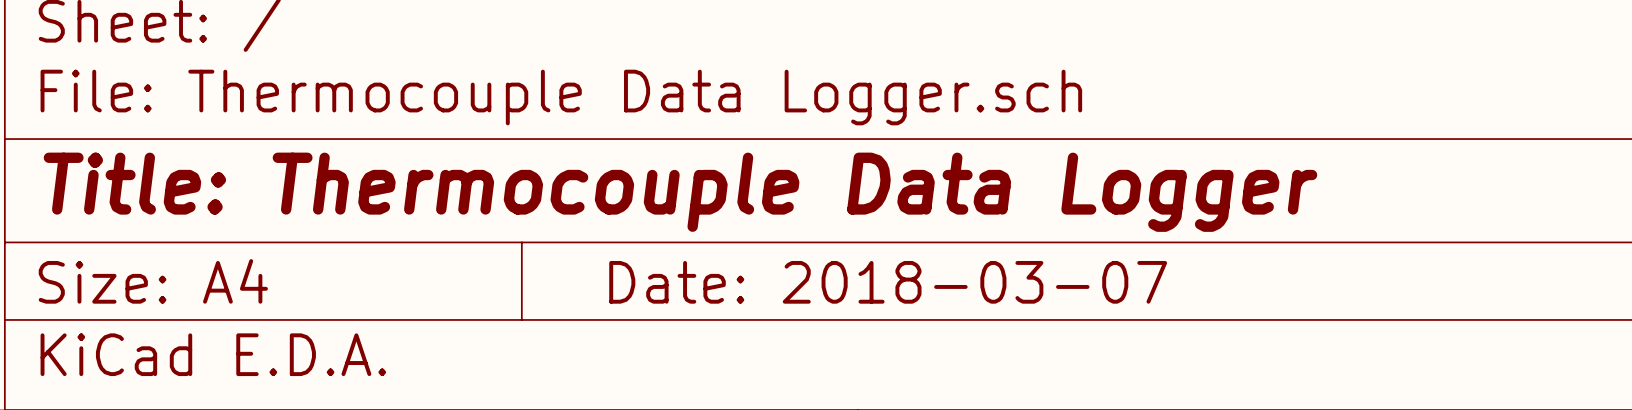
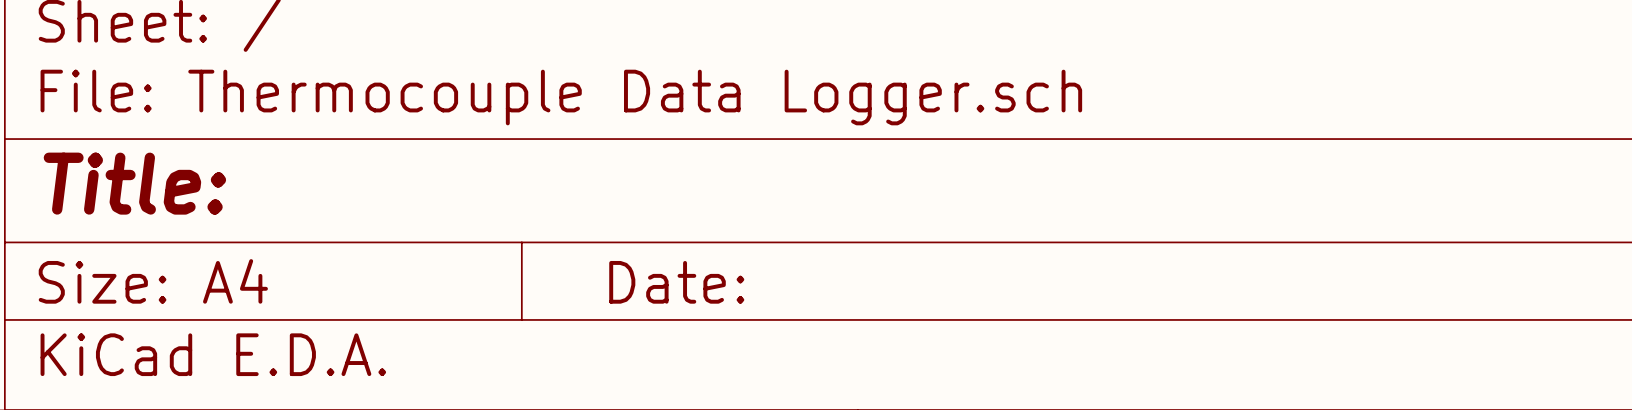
title block: Title: Thermocouple Data Logger (680, 192) -> Title: (134, 183)
title block: Date: 2018-03-07 (888, 282) -> Date: (676, 282)

